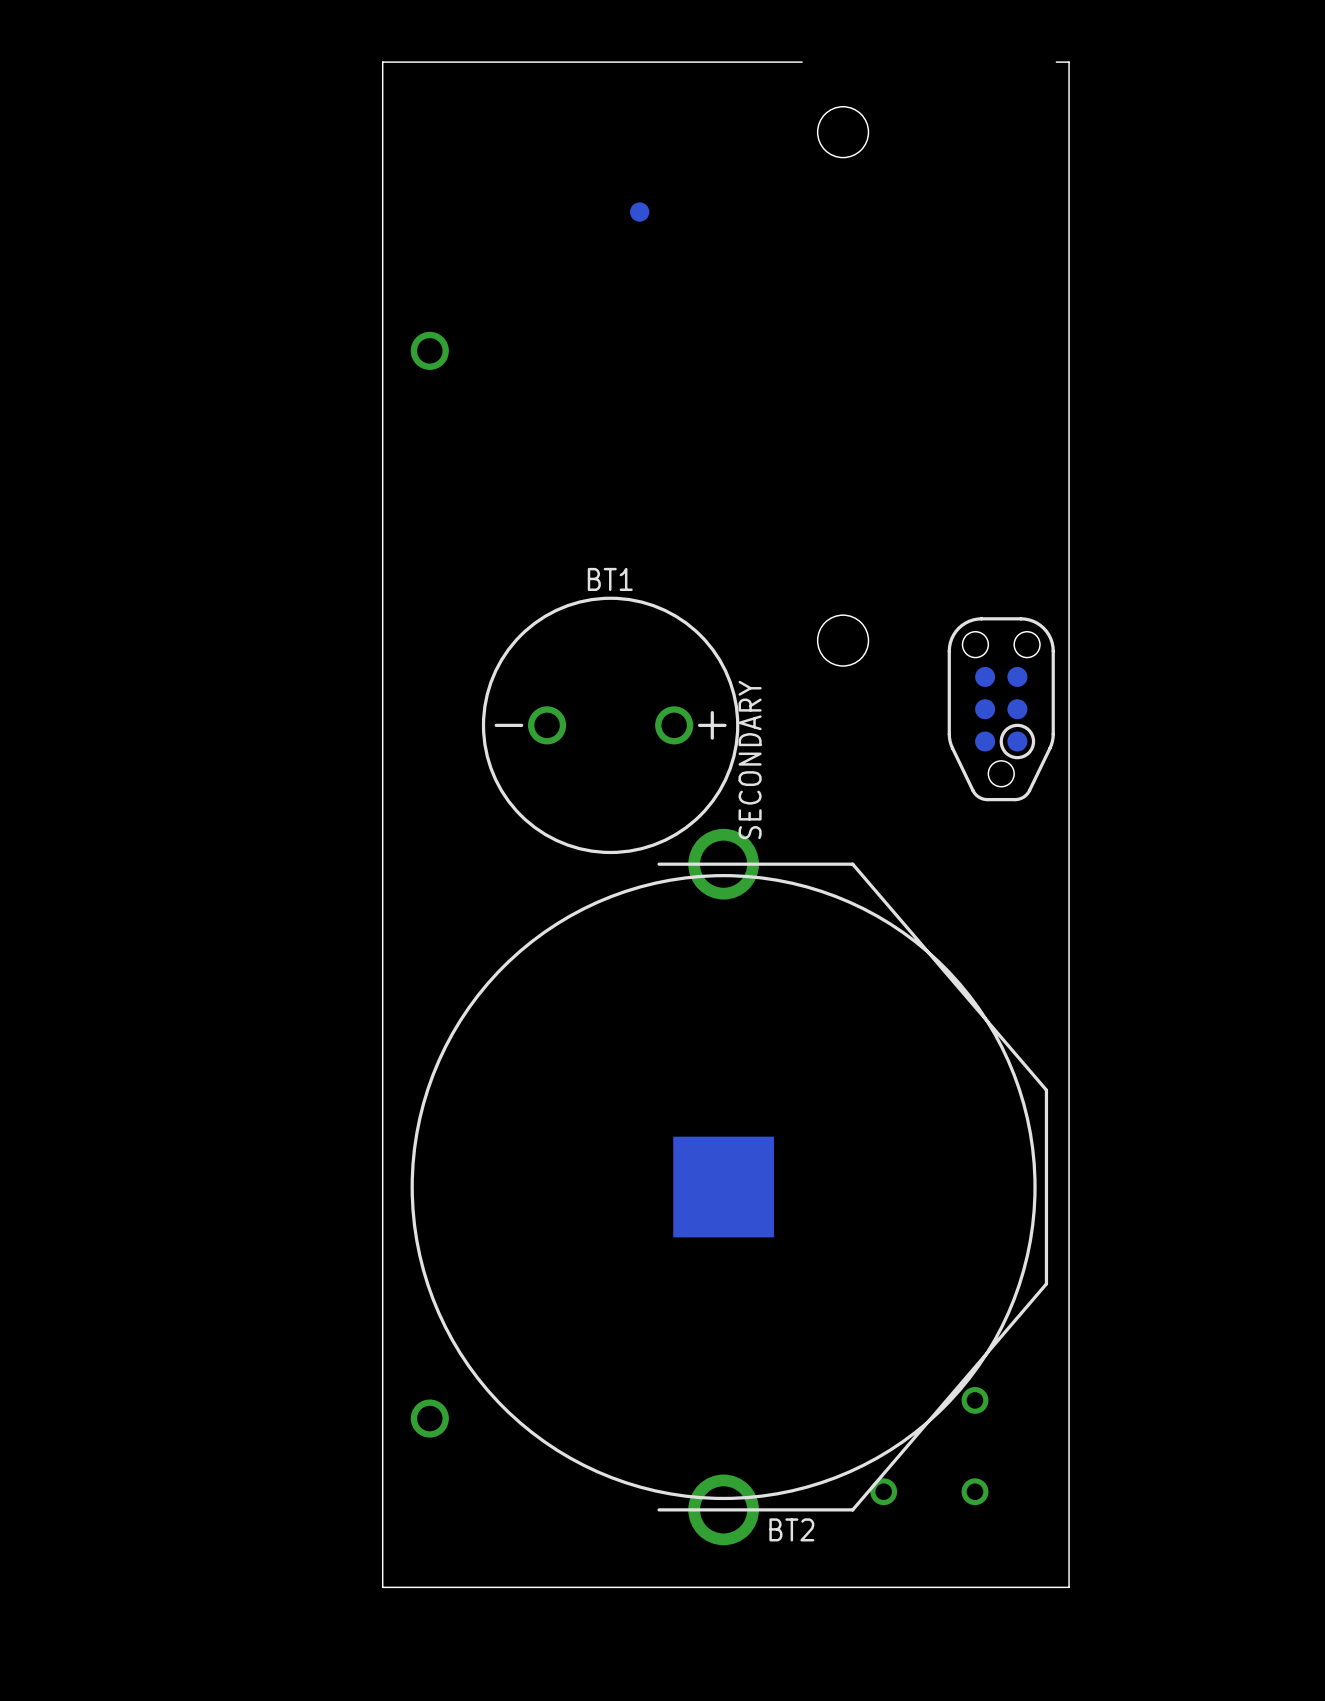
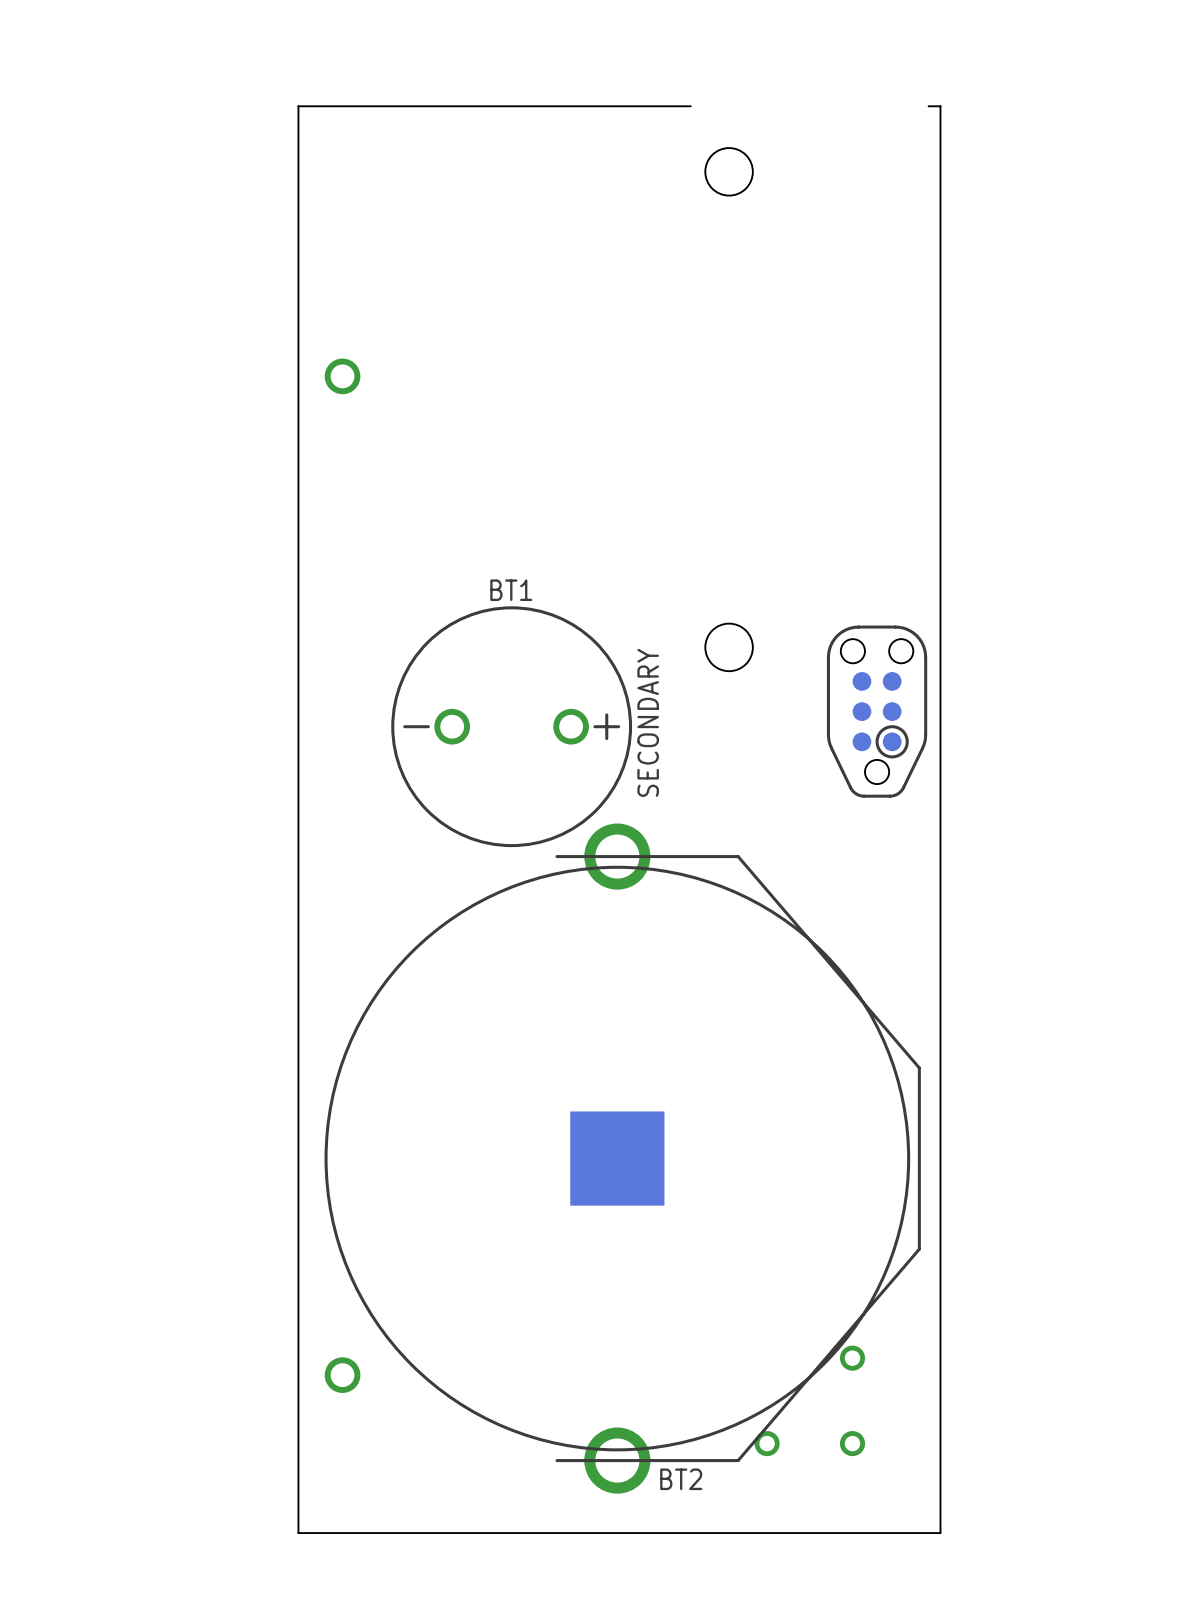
part: (639, 212) -> none
text position: SECONDARY (750, 759) -> SECONDARY (648, 722)

